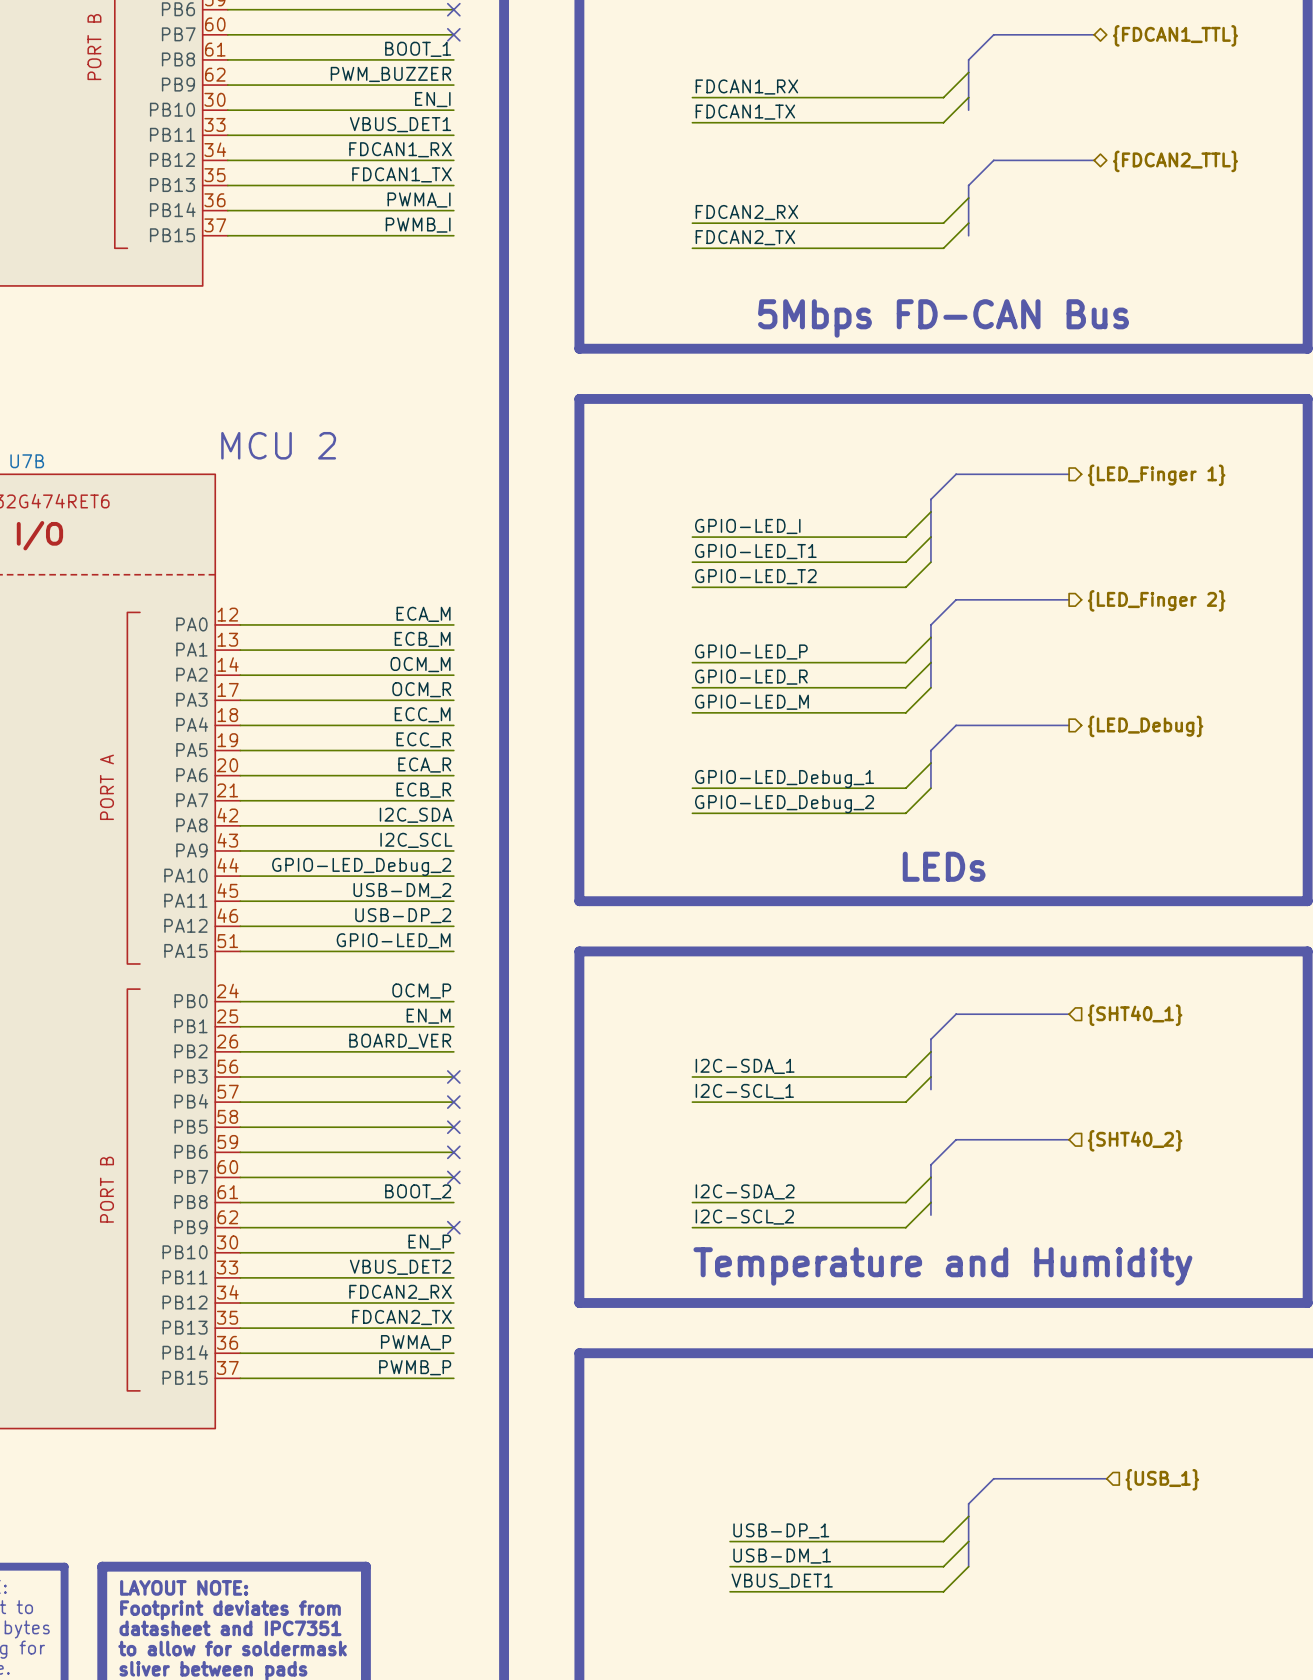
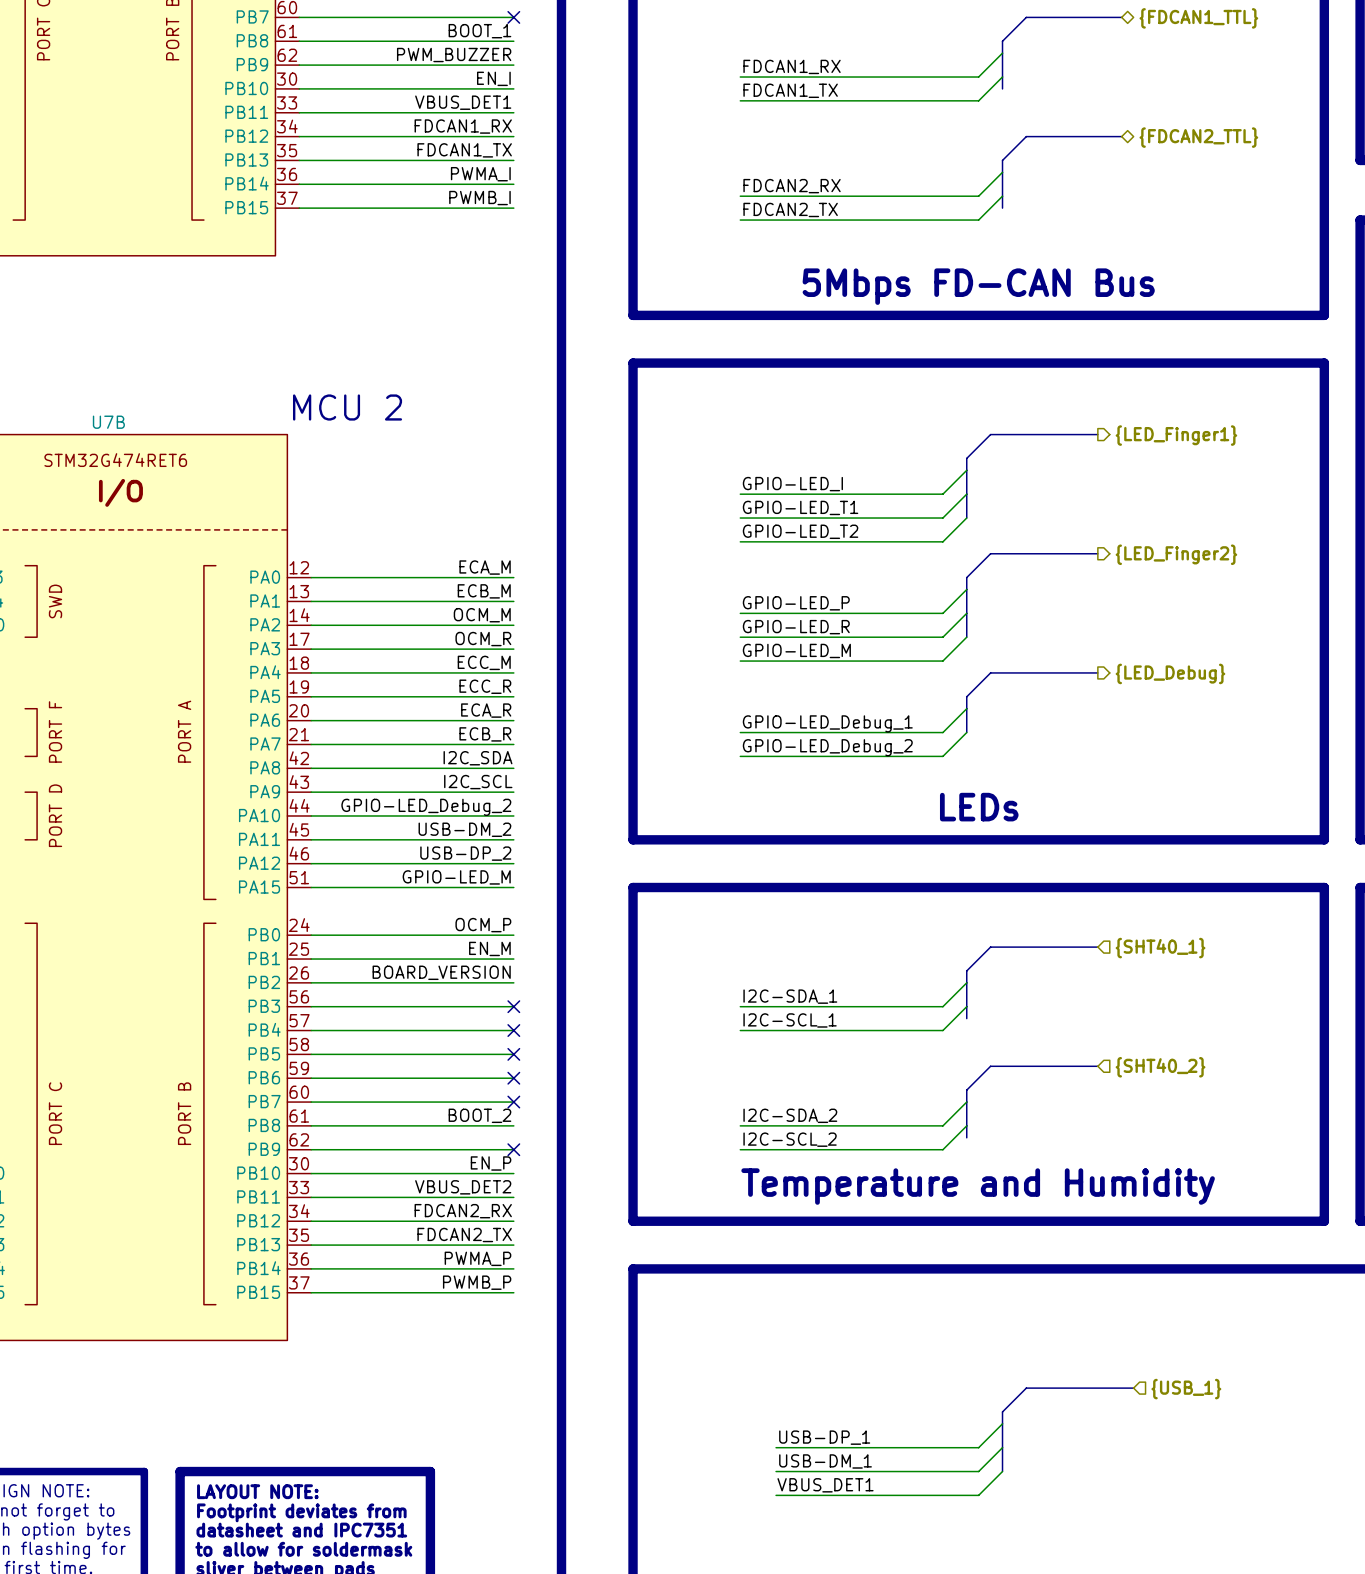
hierarchical label: {LED_Finger 1} (1156, 475) -> {LED_Finger1} (1176, 435)
hierarchical label: {LED_Finger 2} (1156, 600) -> {LED_Finger2} (1176, 554)
label: BOARD_VER (400, 1041) -> BOARD_VERSION (441, 972)

